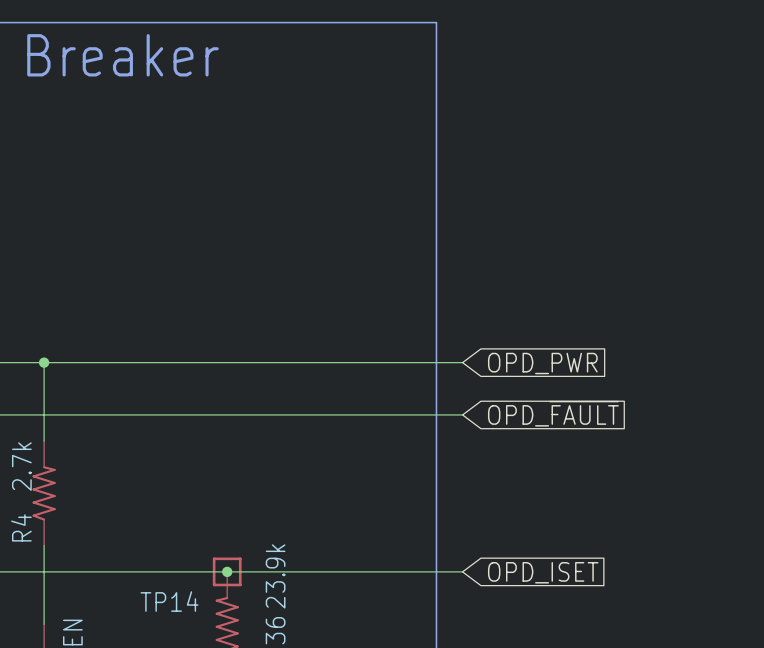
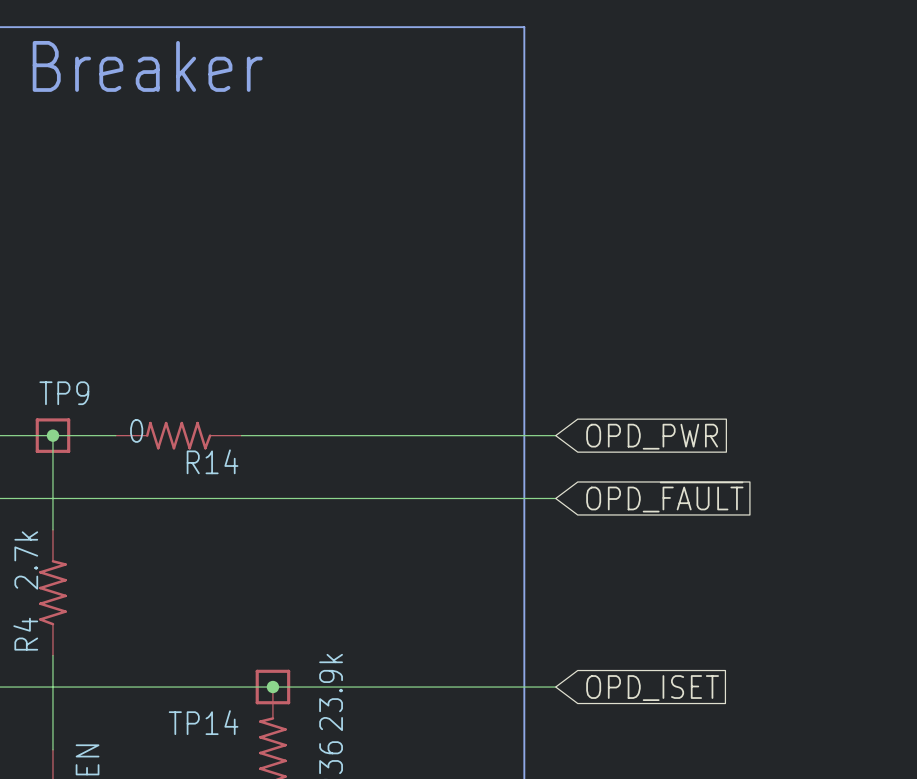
TP9: none -> (52, 435)
R14: none -> 0 (178, 435)

